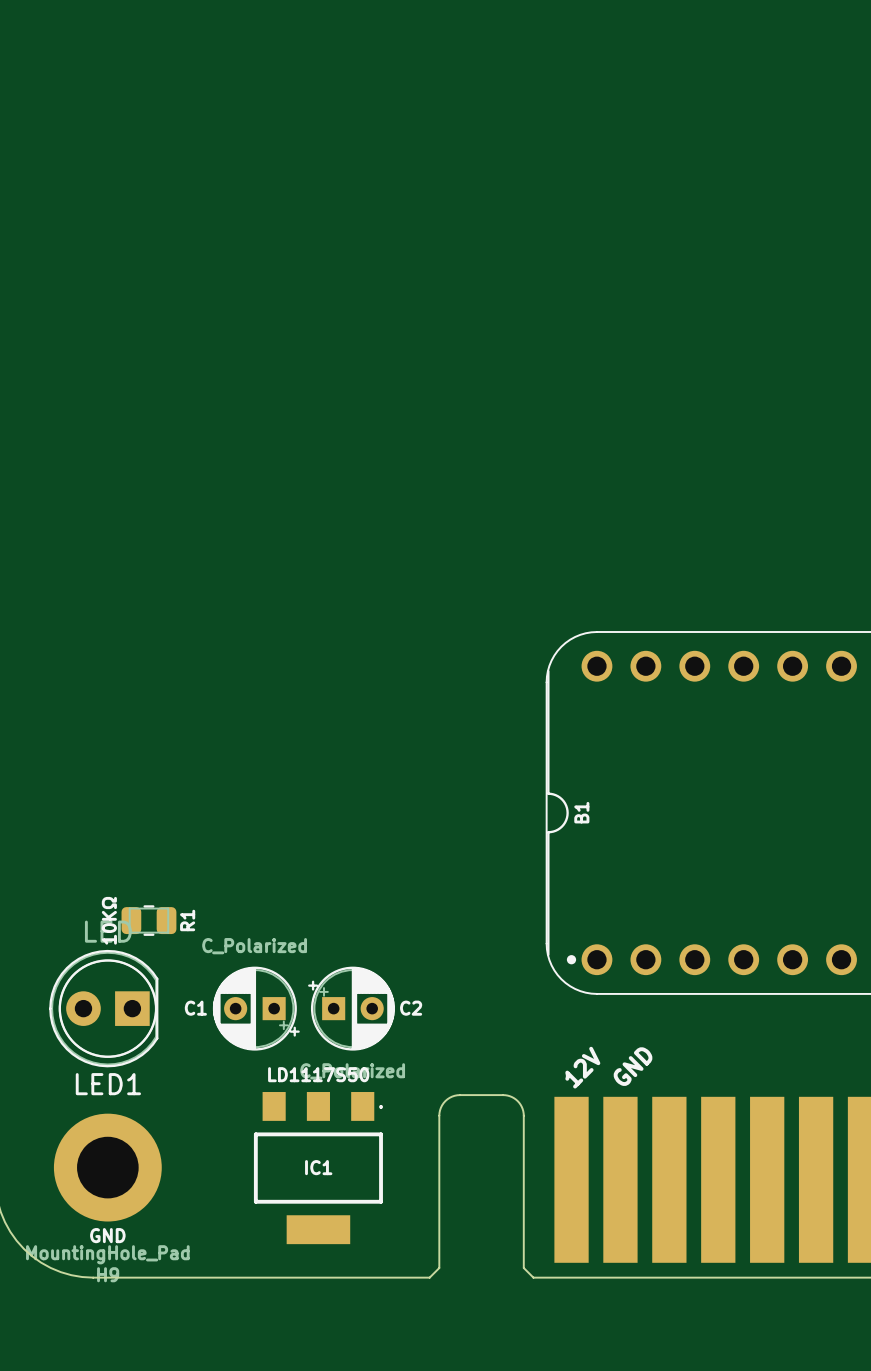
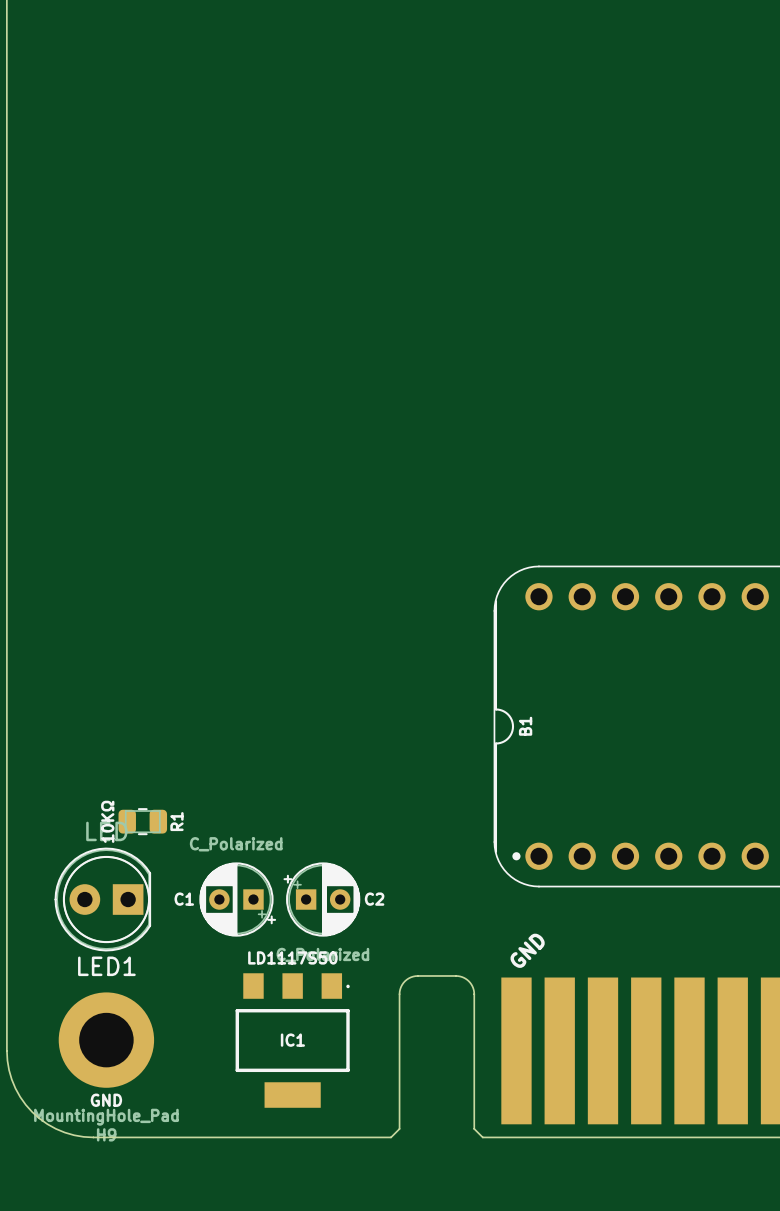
text: GND (633, 1066) -> none
text: 12V (582, 1067) -> GND (527, 950)

